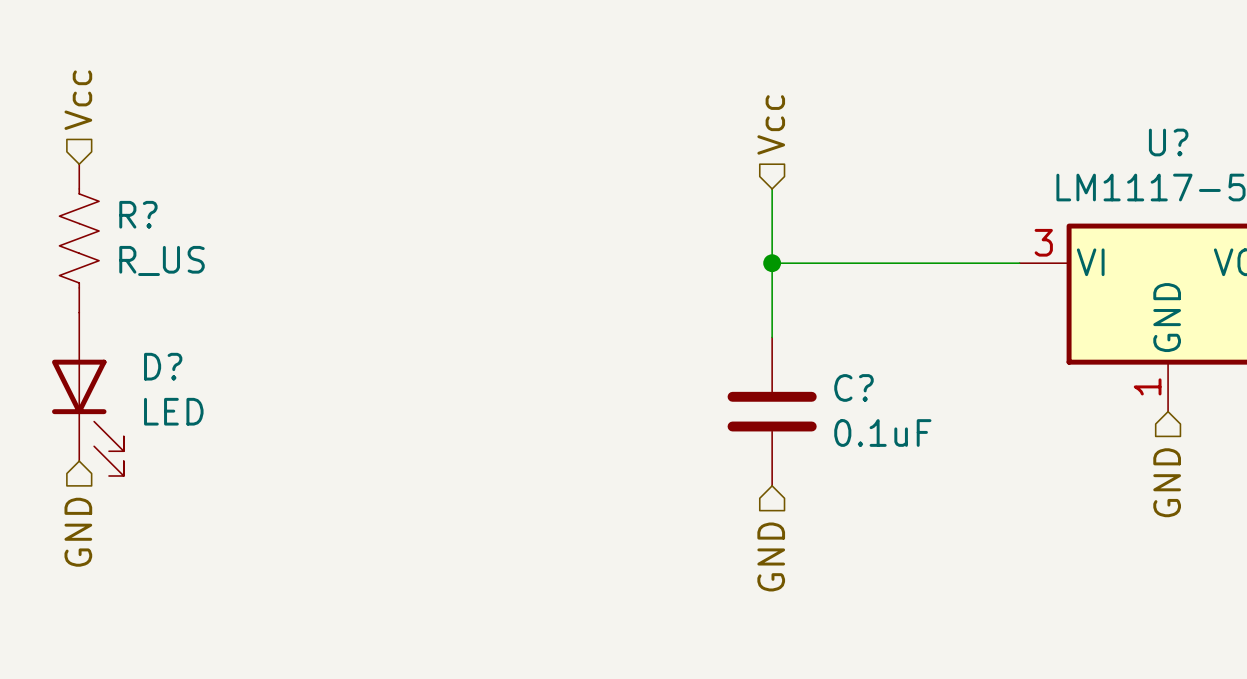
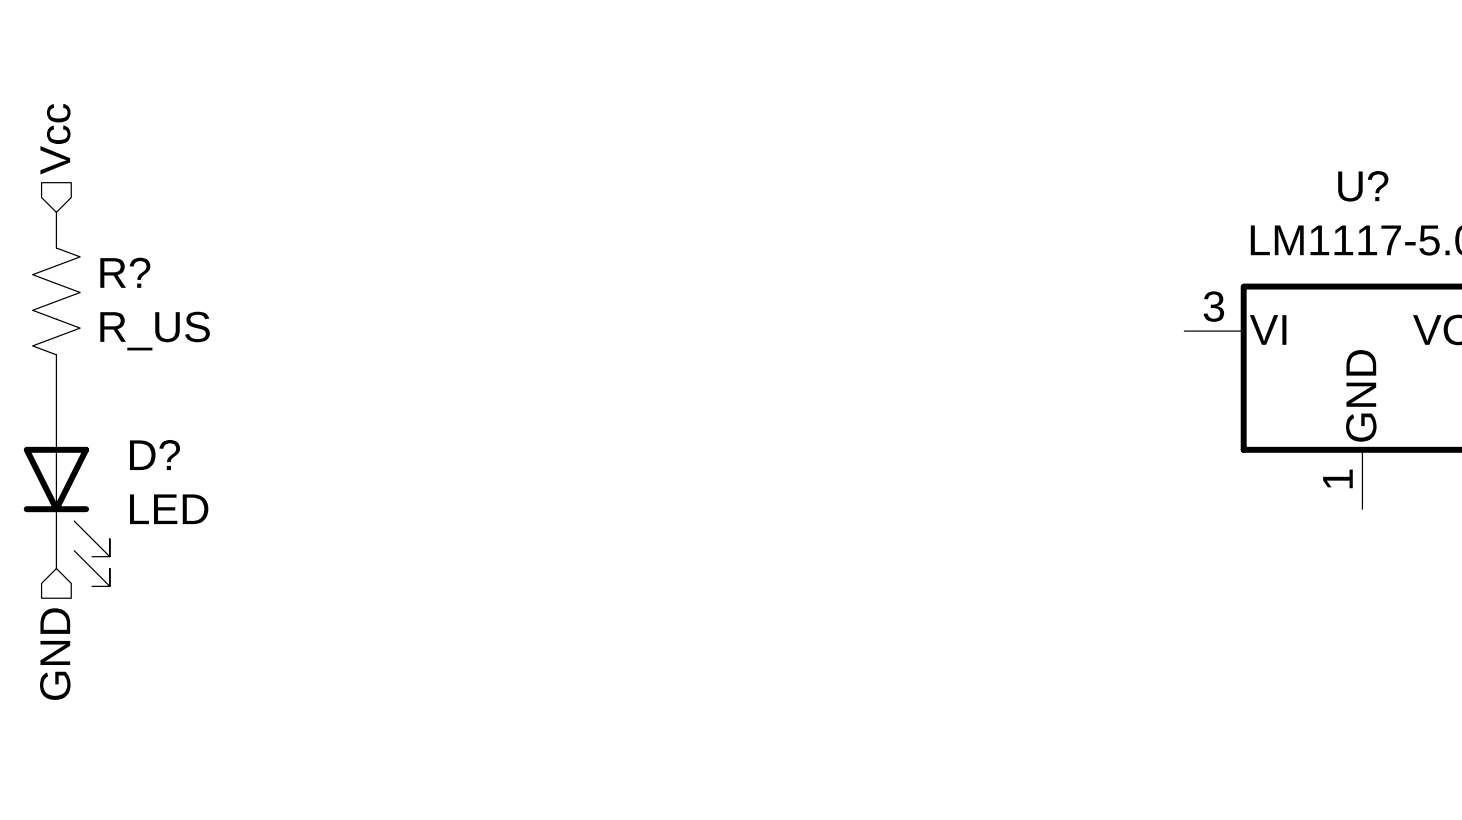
hierarchical label: Vcc (771, 124) -> none
wire: (772, 188) (772, 337) -> none
wire: (772, 263) (1019, 263) -> none
junction: (772, 263) -> none
C?: 0.1uF (772, 411) -> none
hierarchical label: GND (1167, 482) -> none
hierarchical label: GND (771, 556) -> none

